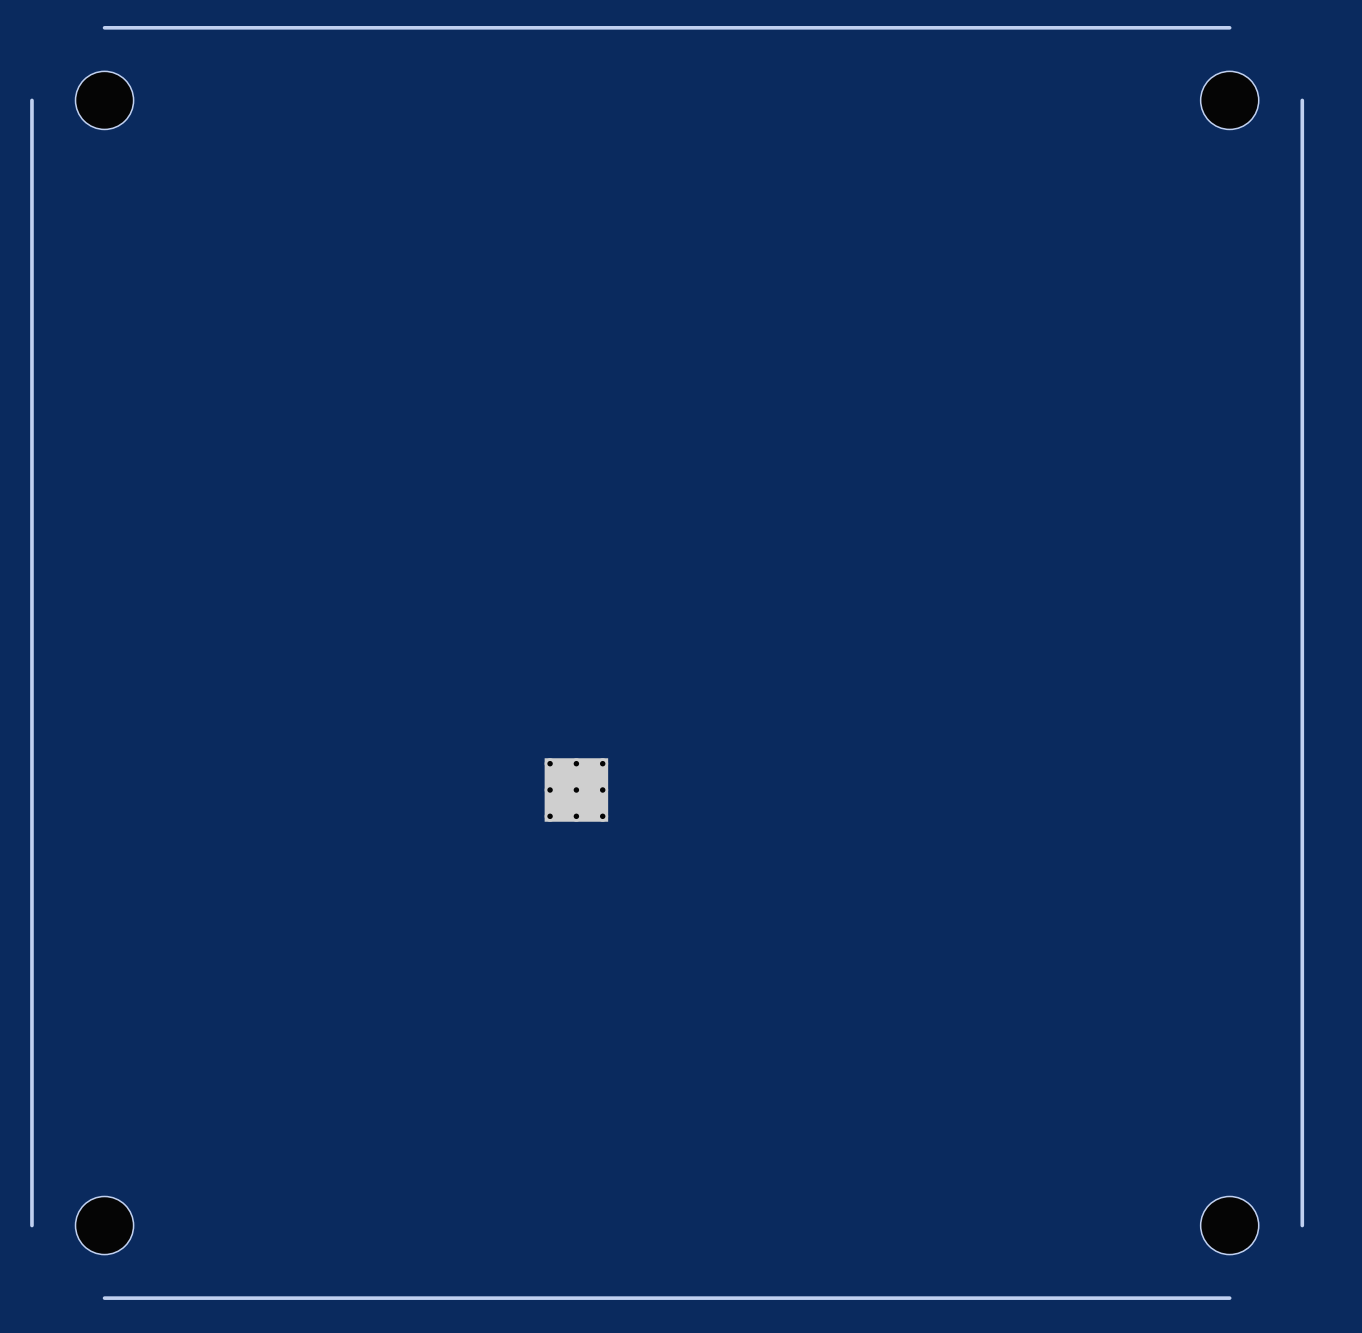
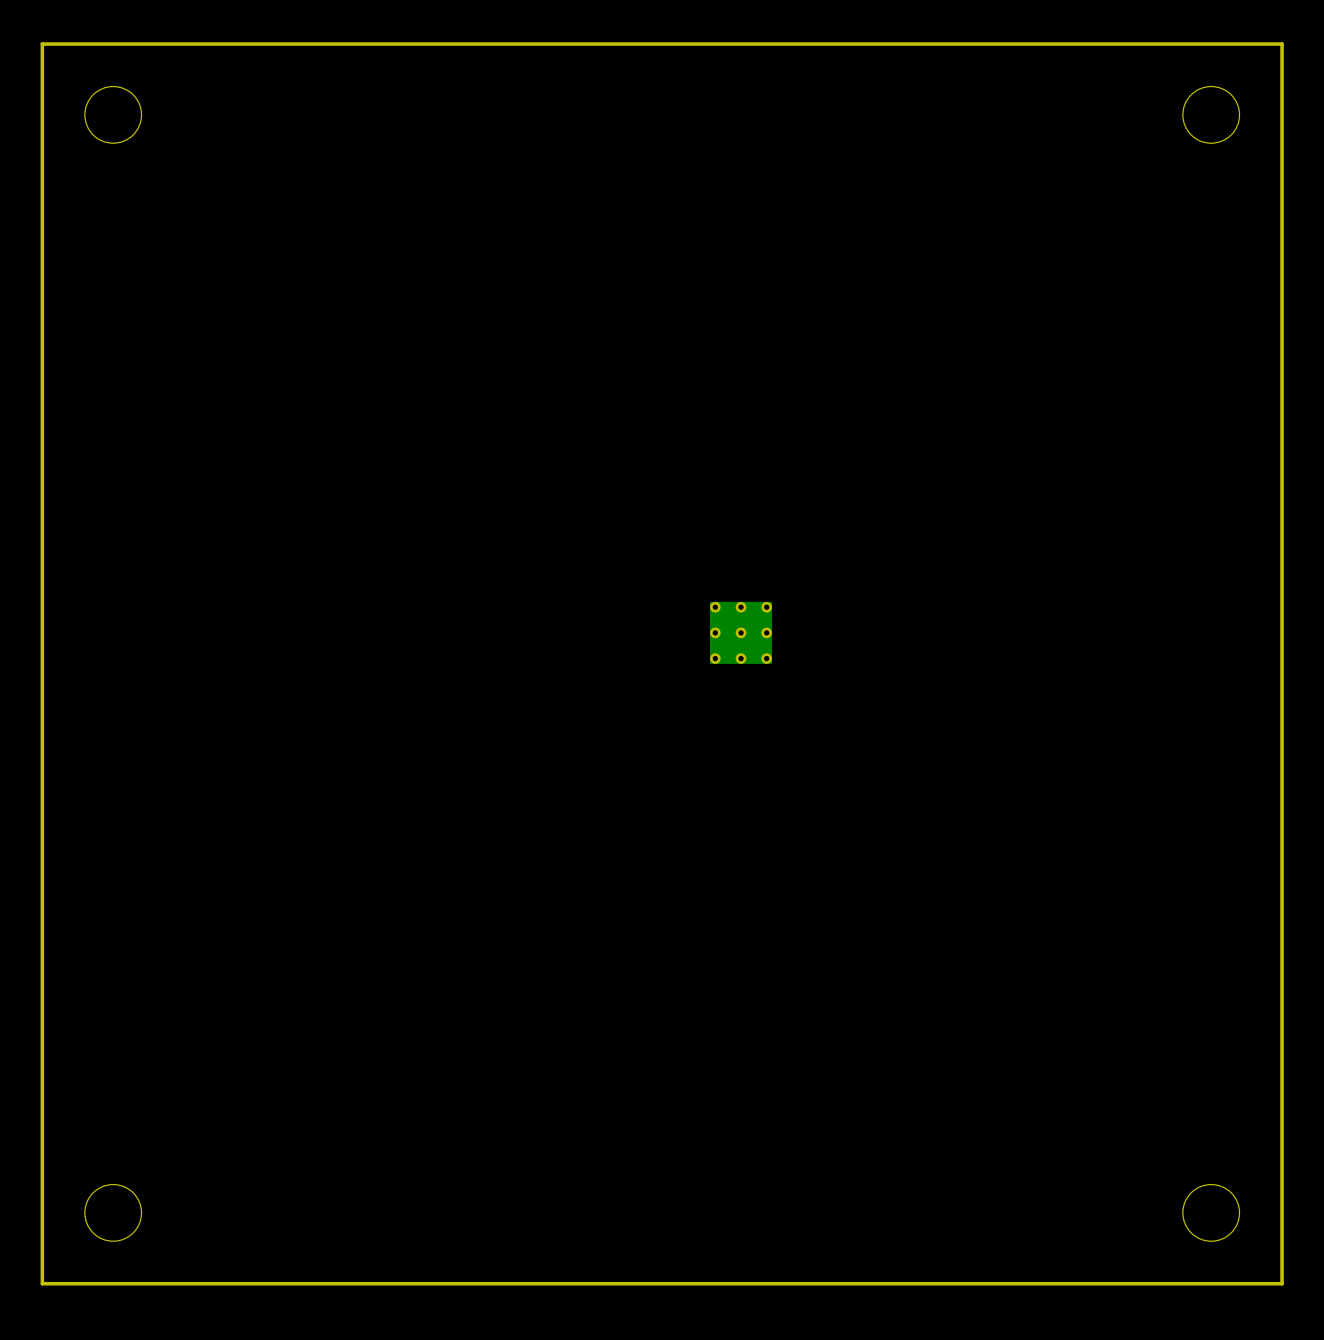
board edge: none -> (113, 44) (42, 44) (42, 114)
board edge: none -> (1211, 44) (1282, 44) (1282, 114)
part position: (576, 790) -> (741, 632)
board edge: none -> (42, 1212) (42, 1283) (113, 1283)
board edge: none -> (1282, 1212) (1282, 1283) (1211, 1283)

